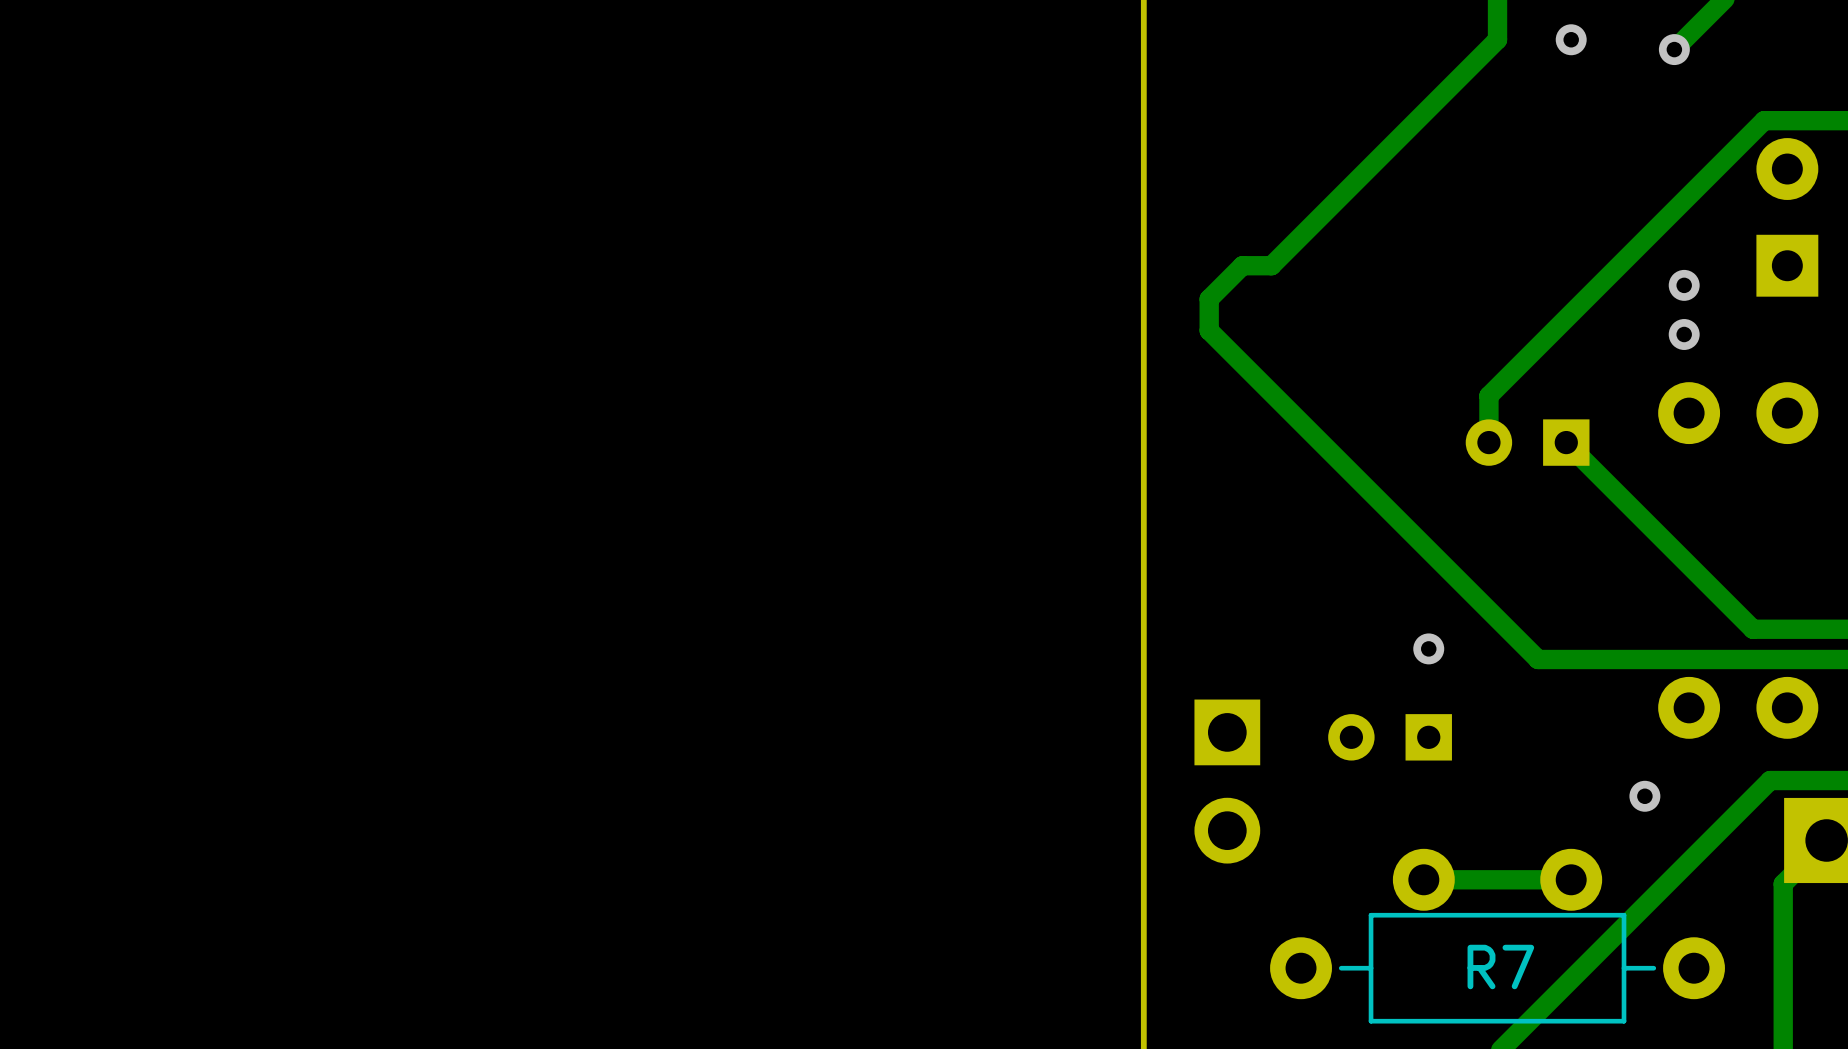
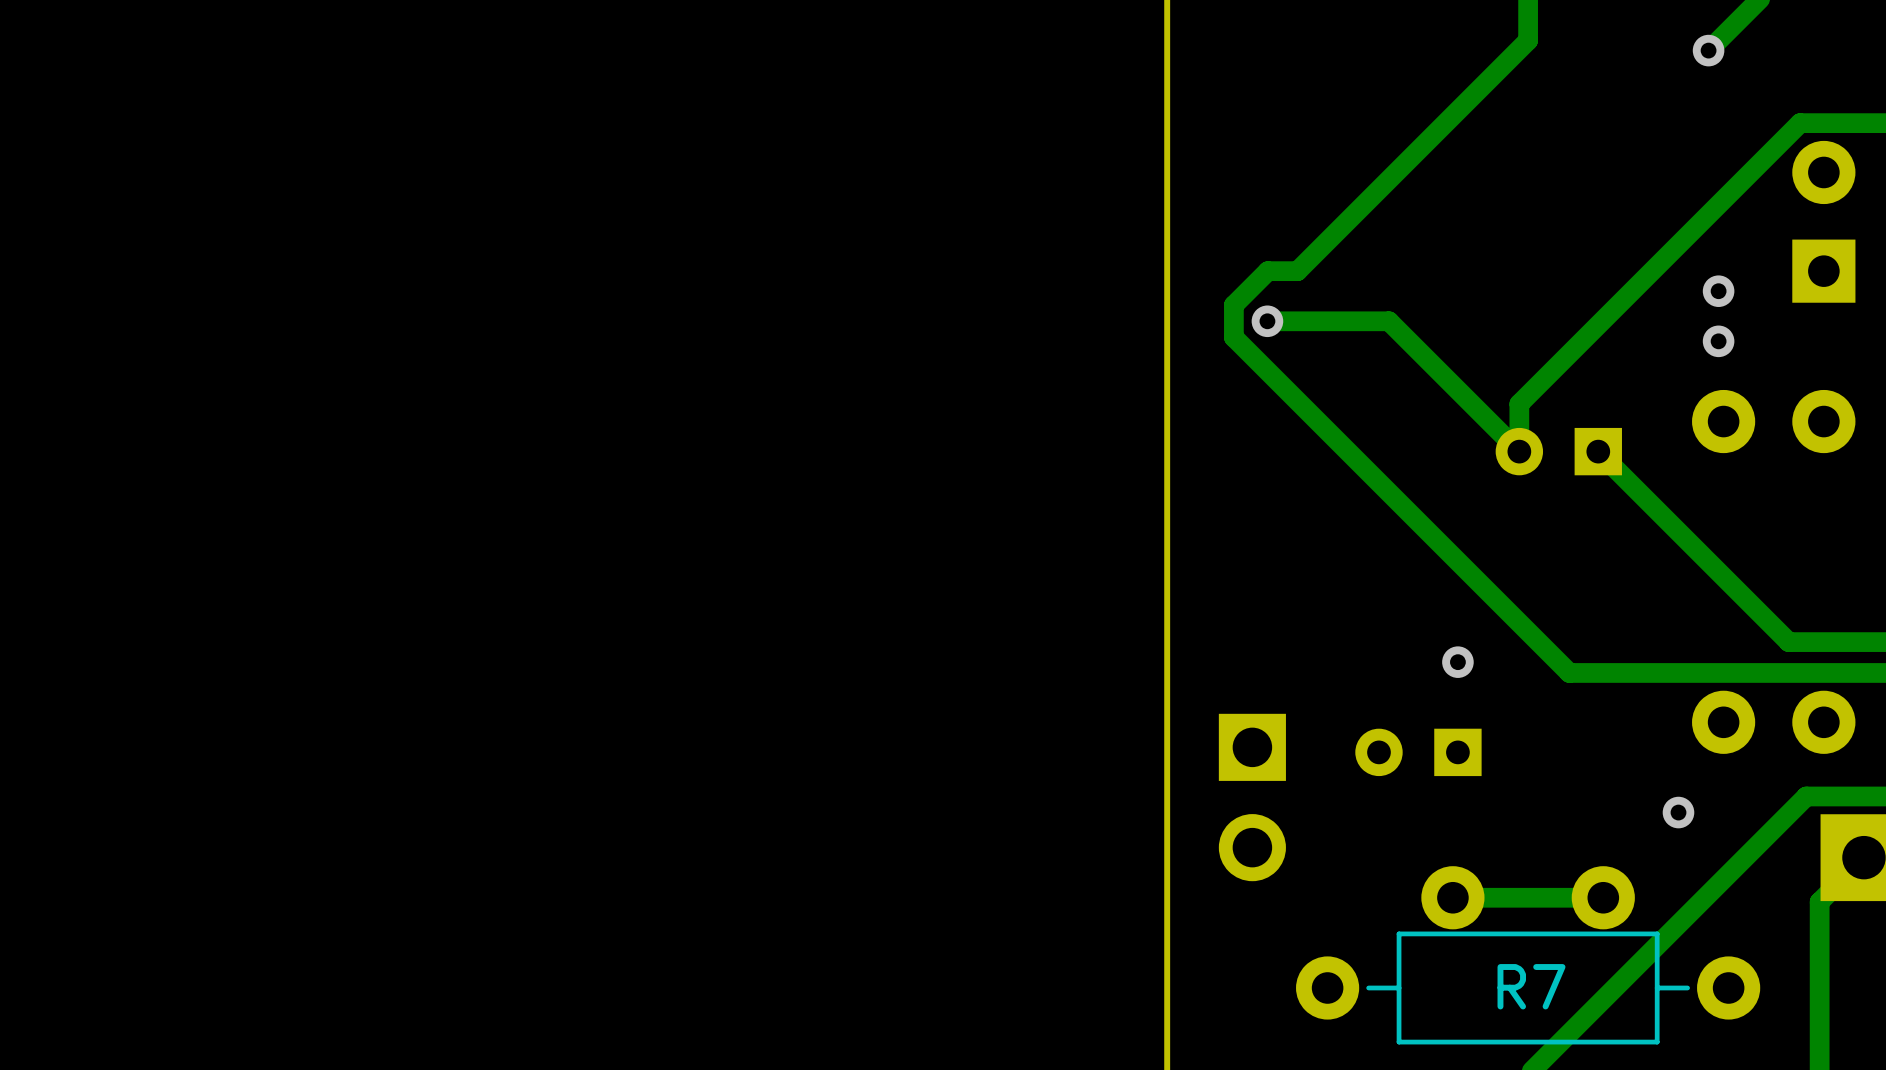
via: (1571, 39) -> none
track: none -> (1267, 321) (1389, 321) (1519, 451)
via: none -> (1267, 321)

